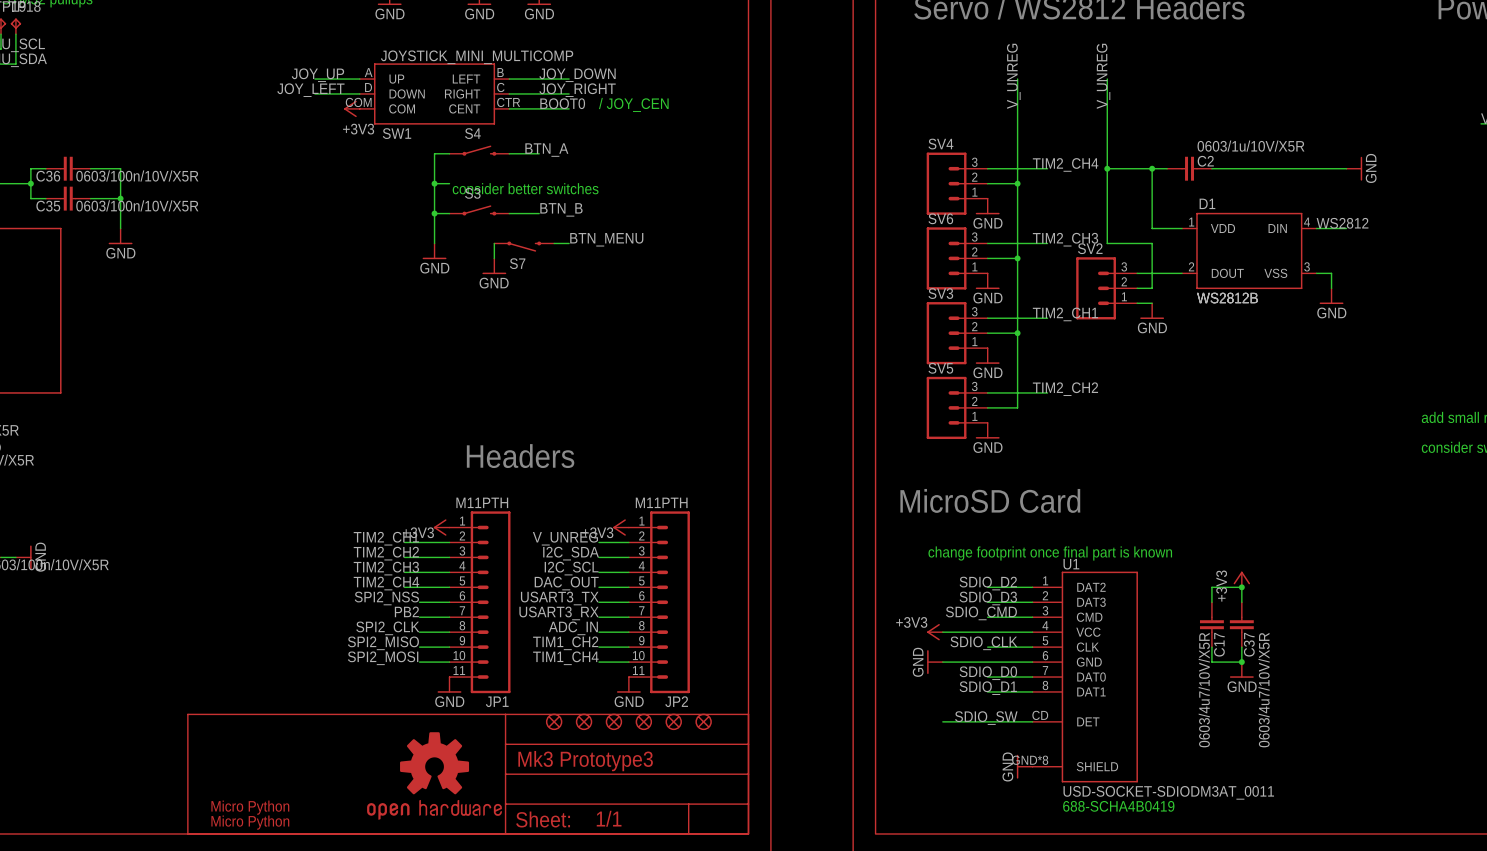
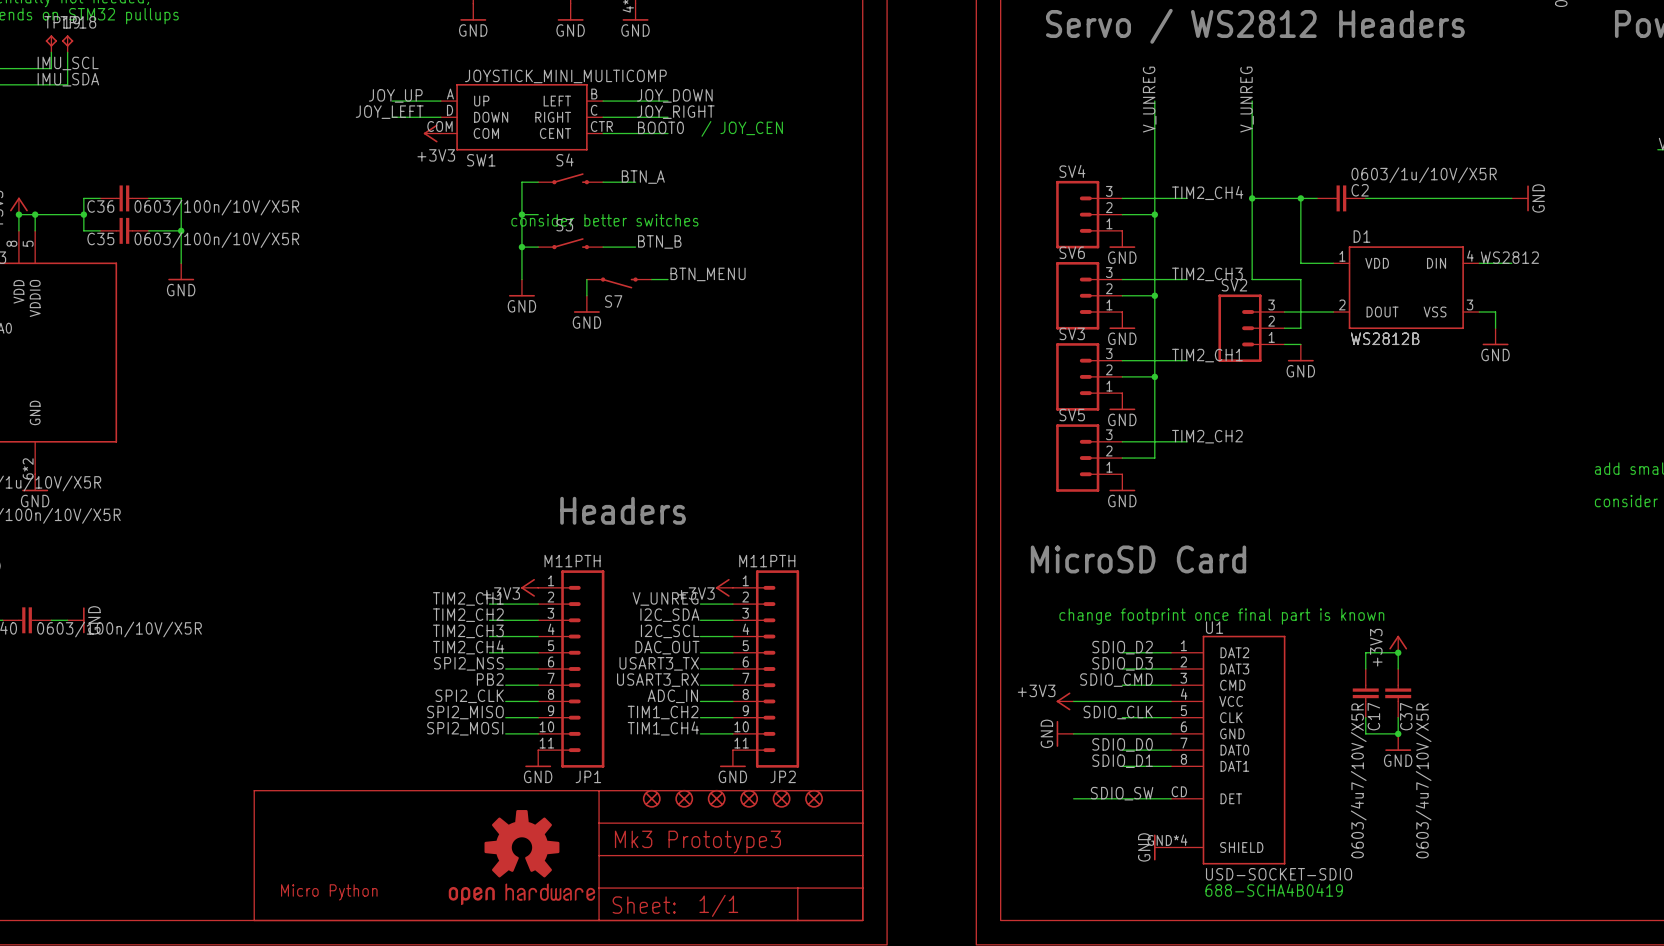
U1 pin number: GND*8 (1030, 760) -> GND*4 (1167, 840)
U1 value: USD-SOCKET-SDIODM3AT_0011 (1168, 792) -> USD-SOCKET-SDIO (1279, 874)
part: (250, 822) -> none

